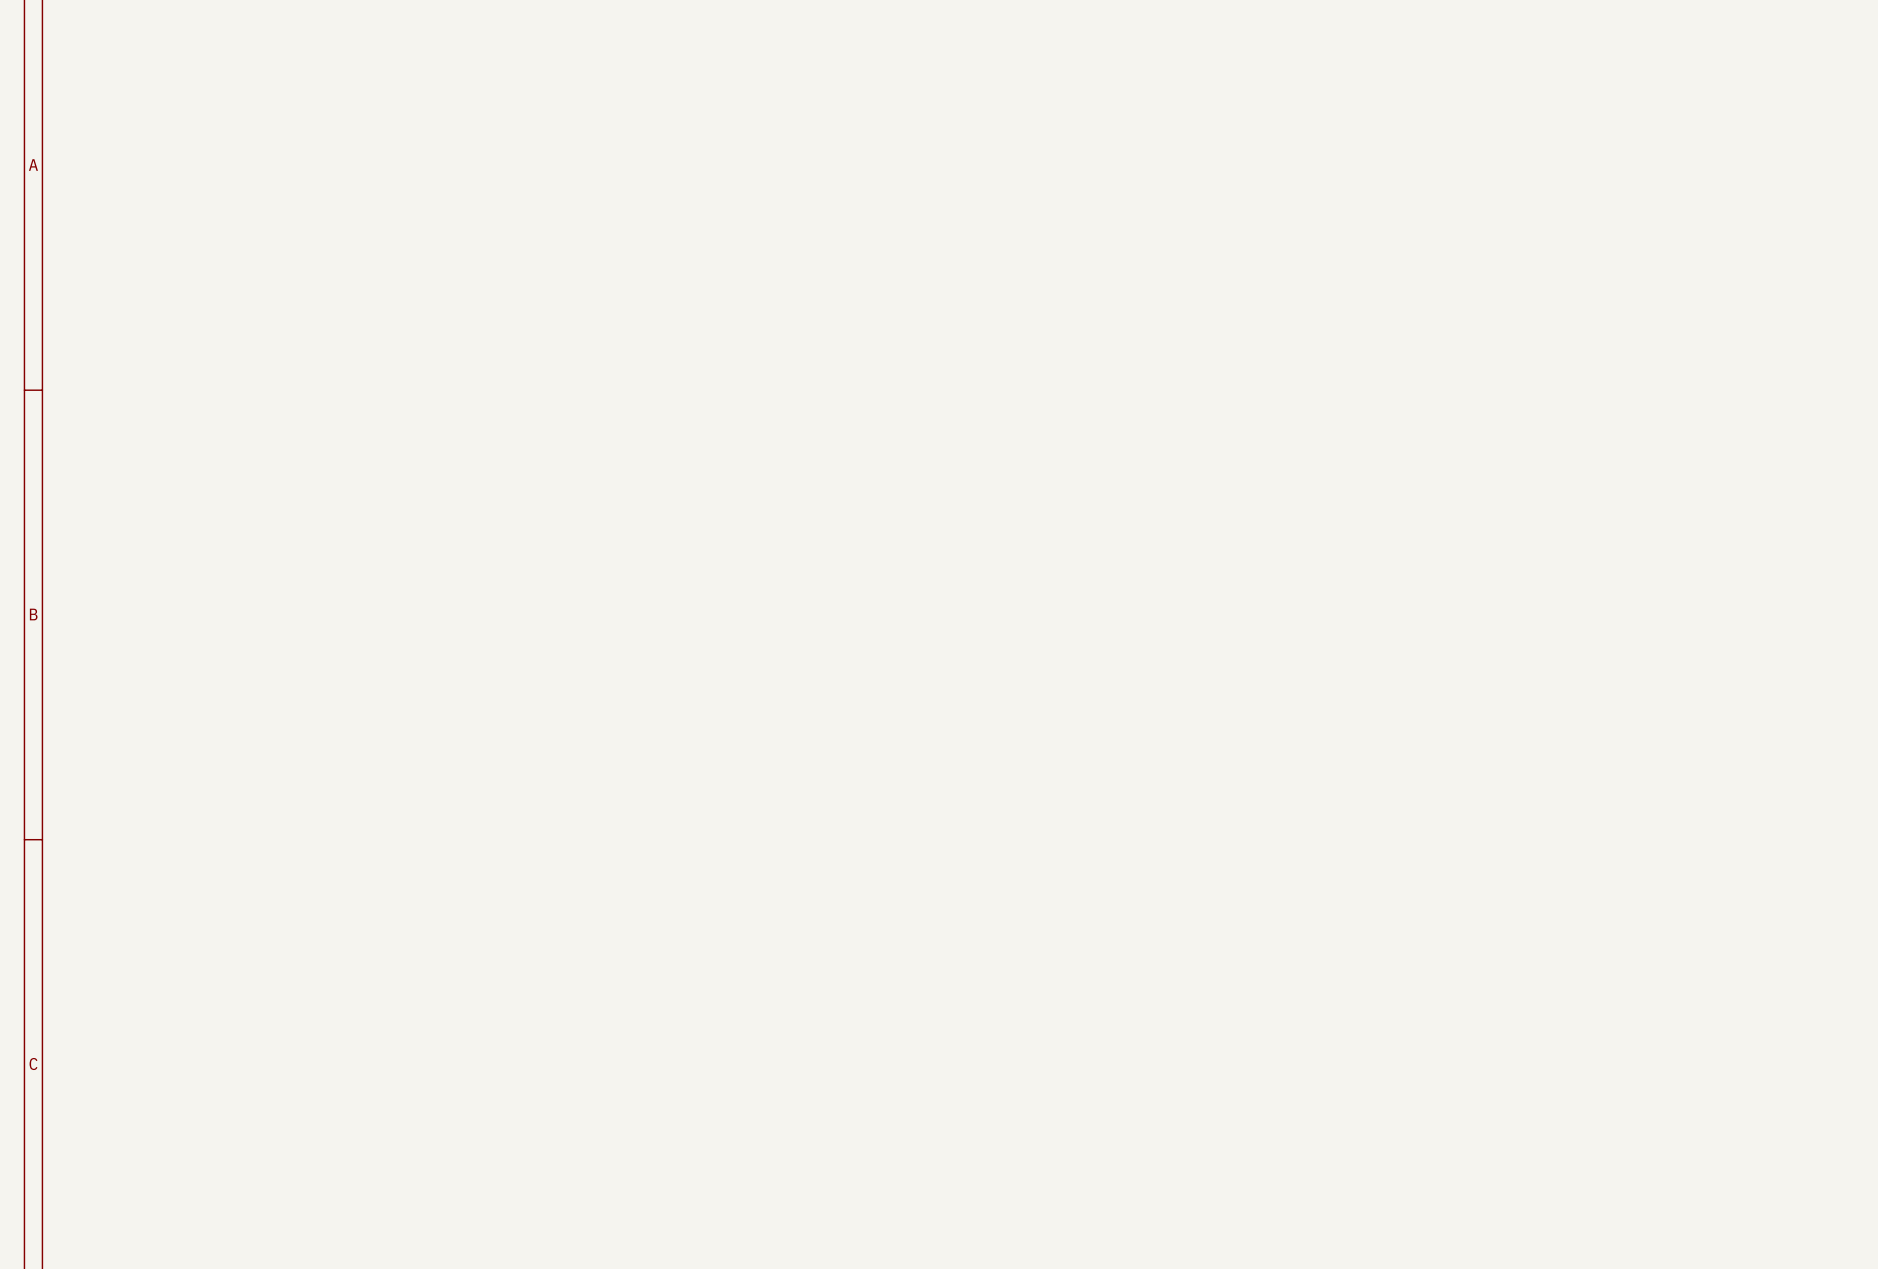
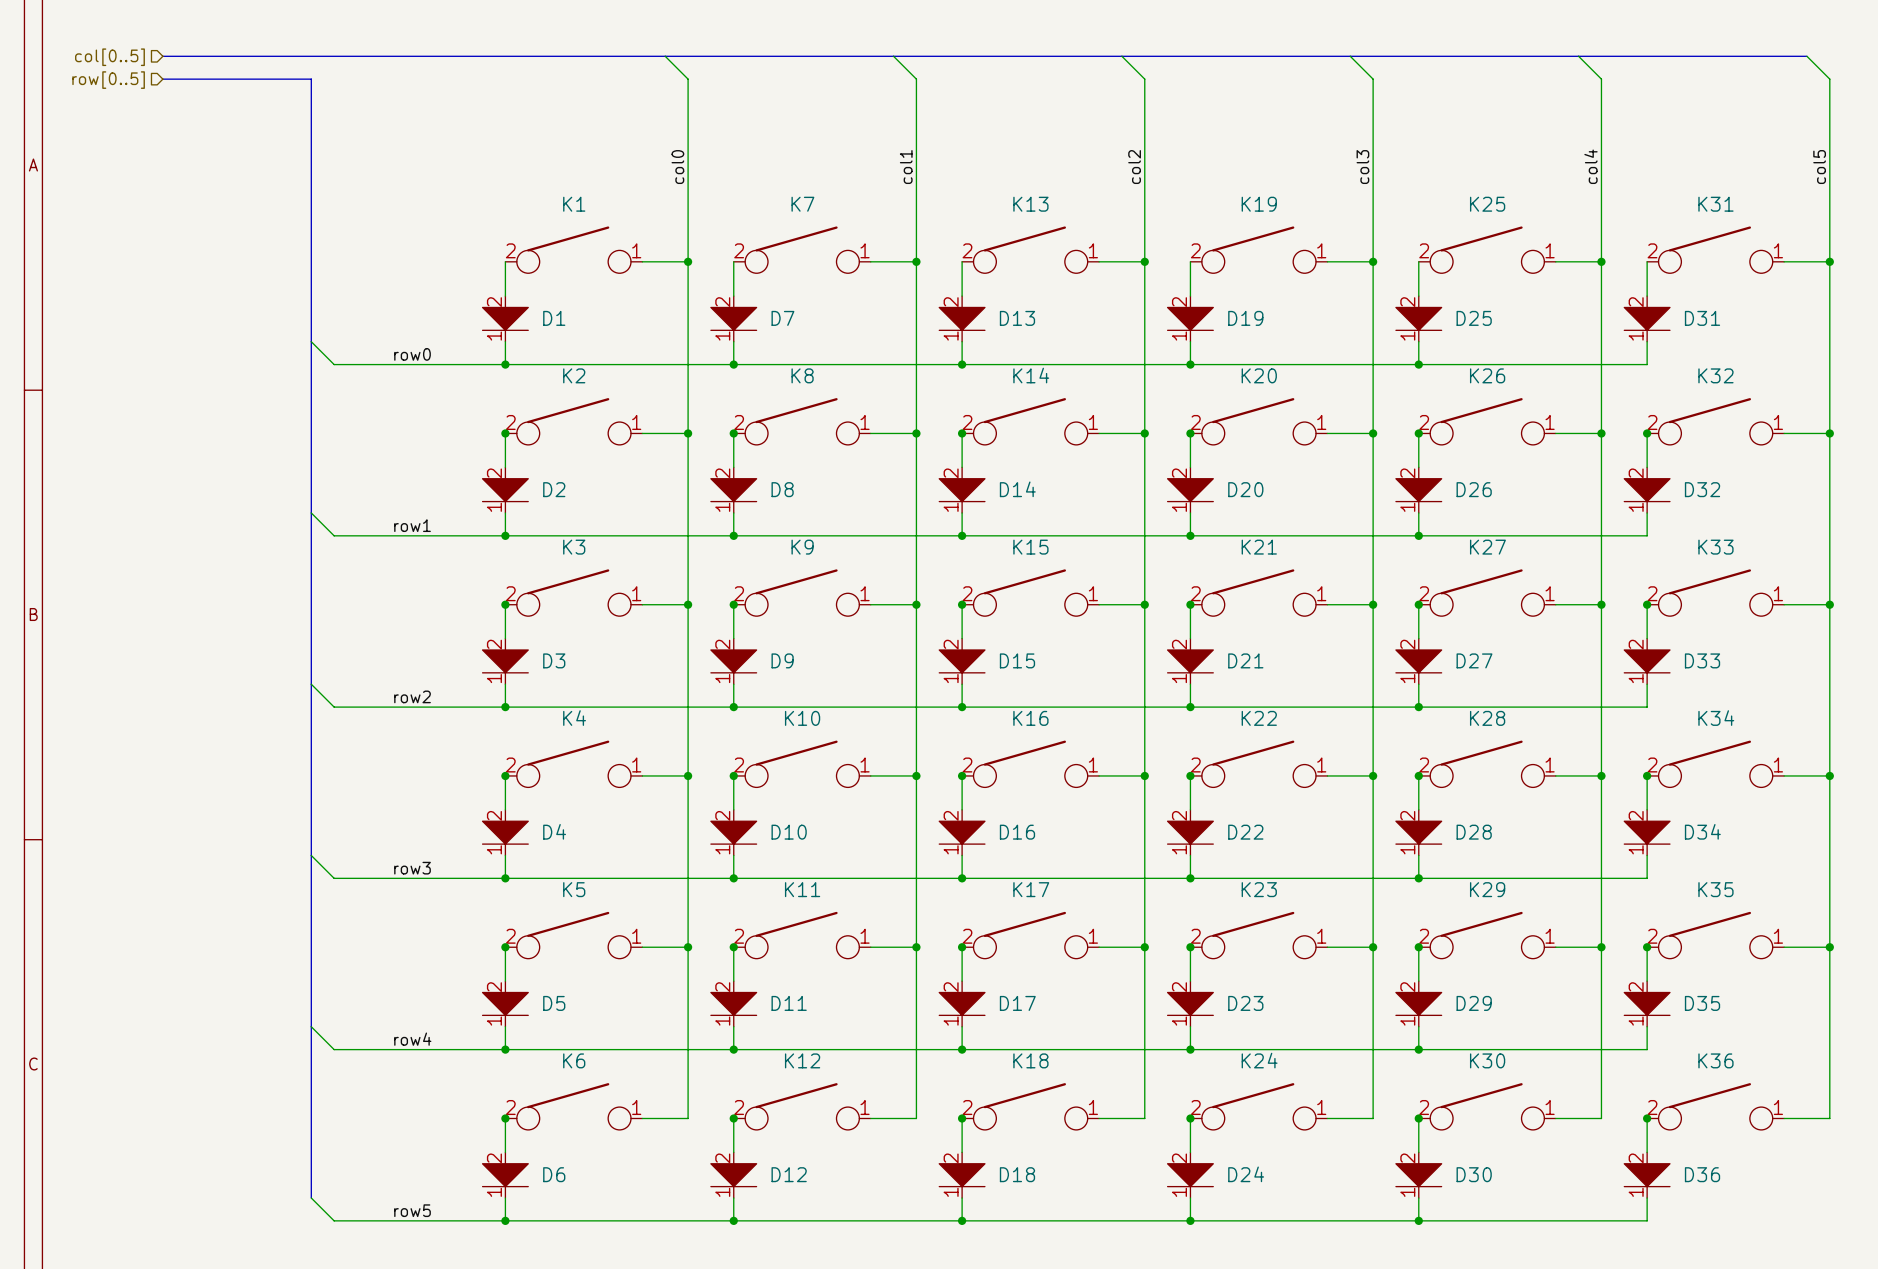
hierarchical label: none -> col[0..5] (109, 57)
bus: none -> (162, 56) (1806, 56)
wire: none -> (665, 56) (688, 79) (688, 1118) (642, 1118)
wire: none -> (893, 56) (916, 79) (916, 1118) (870, 1118)
wire: none -> (1121, 56) (1144, 79) (1144, 1118) (1099, 1118)
wire: none -> (1350, 56) (1373, 79) (1373, 1118) (1327, 1118)
wire: none -> (1578, 56) (1601, 79) (1601, 1118) (1555, 1118)
wire: none -> (1806, 56) (1829, 79) (1829, 1118) (1784, 1118)
hierarchical label: none -> row[0..5] (108, 80)
bus: none -> (162, 79) (311, 79) (311, 1198)
label: none -> col1 (906, 167)
label: none -> col4 (1591, 166)
label: none -> col0 (677, 167)
label: none -> col2 (1134, 167)
label: none -> col3 (1362, 167)
label: none -> col5 (1819, 167)
K1: none -> (573, 249)
K7: none -> (802, 249)
K13: none -> (1030, 249)
K19: none -> (1258, 249)
K25: none -> (1487, 249)
K31: none -> (1715, 249)
wire: none -> (505, 261) (505, 296)
wire: none -> (642, 261) (688, 261)
junction: none -> (688, 261)
wire: none -> (733, 261) (733, 296)
wire: none -> (870, 261) (916, 261)
junction: none -> (916, 261)
wire: none -> (962, 261) (962, 296)
wire: none -> (1099, 261) (1144, 261)
junction: none -> (1144, 261)
wire: none -> (1190, 261) (1190, 296)
wire: none -> (1327, 261) (1373, 261)
junction: none -> (1373, 261)
wire: none -> (1418, 261) (1418, 296)
wire: none -> (1555, 261) (1601, 261)
junction: none -> (1601, 261)
wire: none -> (1647, 261) (1647, 296)
wire: none -> (1784, 261) (1829, 261)
junction: none -> (1829, 261)
D1: none -> (505, 318)
D7: none -> (733, 318)
D13: none -> (962, 318)
D19: none -> (1190, 318)
D25: none -> (1418, 318)
D31: none -> (1647, 318)
wire: none -> (311, 341) (334, 364) (1647, 364) (1647, 341)
wire: none -> (505, 341) (505, 364)
wire: none -> (733, 341) (733, 364)
wire: none -> (962, 341) (962, 364)
wire: none -> (1190, 341) (1190, 364)
wire: none -> (1418, 341) (1418, 364)
label: none -> row0 (412, 354)
junction: none -> (505, 364)
junction: none -> (733, 364)
junction: none -> (962, 364)
junction: none -> (1190, 364)
junction: none -> (1418, 364)
K2: none -> (573, 421)
K8: none -> (802, 421)
K14: none -> (1030, 421)
K20: none -> (1258, 421)
K26: none -> (1487, 421)
K32: none -> (1715, 421)
wire: none -> (505, 433) (505, 467)
junction: none -> (505, 433)
wire: none -> (642, 433) (688, 433)
junction: none -> (688, 433)
wire: none -> (733, 433) (733, 467)
junction: none -> (733, 433)
wire: none -> (870, 433) (916, 433)
junction: none -> (916, 433)
wire: none -> (962, 433) (962, 467)
junction: none -> (962, 433)
wire: none -> (1099, 433) (1144, 433)
junction: none -> (1144, 433)
wire: none -> (1190, 433) (1190, 467)
junction: none -> (1190, 433)
wire: none -> (1327, 433) (1373, 433)
junction: none -> (1373, 433)
wire: none -> (1418, 433) (1418, 467)
junction: none -> (1418, 433)
wire: none -> (1555, 433) (1601, 433)
junction: none -> (1601, 433)
wire: none -> (1647, 433) (1647, 467)
junction: none -> (1647, 433)
wire: none -> (1784, 433) (1829, 433)
junction: none -> (1829, 433)
D2: none -> (505, 490)
D8: none -> (733, 490)
D14: none -> (962, 490)
D20: none -> (1190, 490)
D26: none -> (1418, 490)
D32: none -> (1647, 490)
wire: none -> (311, 513) (334, 535) (1647, 535) (1647, 513)
wire: none -> (505, 513) (505, 535)
wire: none -> (733, 513) (733, 535)
wire: none -> (962, 513) (962, 535)
wire: none -> (1190, 513) (1190, 535)
wire: none -> (1418, 513) (1418, 535)
label: none -> row1 (412, 525)
junction: none -> (505, 535)
junction: none -> (733, 535)
junction: none -> (962, 535)
junction: none -> (1190, 535)
junction: none -> (1418, 535)
K3: none -> (573, 592)
K9: none -> (802, 592)
K15: none -> (1030, 592)
K21: none -> (1258, 592)
K27: none -> (1487, 592)
K33: none -> (1715, 592)
wire: none -> (505, 604) (505, 638)
junction: none -> (505, 604)
wire: none -> (642, 604) (688, 604)
junction: none -> (688, 604)
wire: none -> (733, 604) (733, 638)
junction: none -> (733, 604)
wire: none -> (870, 604) (916, 604)
junction: none -> (916, 604)
wire: none -> (962, 604) (962, 638)
junction: none -> (962, 604)
wire: none -> (1099, 604) (1144, 604)
junction: none -> (1144, 604)
wire: none -> (1190, 604) (1190, 638)
junction: none -> (1190, 604)
wire: none -> (1327, 604) (1373, 604)
junction: none -> (1373, 604)
wire: none -> (1418, 604) (1418, 638)
junction: none -> (1418, 604)
wire: none -> (1555, 604) (1601, 604)
junction: none -> (1601, 604)
wire: none -> (1647, 604) (1647, 638)
junction: none -> (1647, 604)
wire: none -> (1784, 604) (1829, 604)
junction: none -> (1829, 604)
D3: none -> (505, 661)
D9: none -> (733, 661)
D15: none -> (962, 661)
D21: none -> (1190, 661)
D27: none -> (1418, 661)
D33: none -> (1647, 661)
wire: none -> (311, 684) (334, 707) (1647, 707) (1647, 684)
wire: none -> (505, 684) (505, 707)
wire: none -> (733, 684) (733, 707)
wire: none -> (962, 684) (962, 707)
wire: none -> (1190, 684) (1190, 707)
wire: none -> (1418, 684) (1418, 707)
label: none -> row2 (412, 696)
junction: none -> (505, 707)
junction: none -> (733, 707)
junction: none -> (962, 707)
junction: none -> (1190, 707)
junction: none -> (1418, 707)
K4: none -> (573, 763)
K10: none -> (802, 763)
K16: none -> (1030, 763)
K22: none -> (1258, 763)
K28: none -> (1487, 763)
K34: none -> (1715, 763)
wire: none -> (505, 775) (505, 809)
junction: none -> (505, 775)
wire: none -> (642, 775) (688, 775)
junction: none -> (688, 775)
wire: none -> (733, 775) (733, 809)
junction: none -> (733, 775)
wire: none -> (870, 775) (916, 775)
junction: none -> (916, 775)
wire: none -> (962, 775) (962, 809)
junction: none -> (962, 775)
wire: none -> (1099, 775) (1144, 775)
junction: none -> (1144, 775)
wire: none -> (1190, 775) (1190, 809)
junction: none -> (1190, 775)
wire: none -> (1327, 775) (1373, 775)
junction: none -> (1373, 775)
wire: none -> (1418, 775) (1418, 809)
junction: none -> (1418, 775)
wire: none -> (1555, 775) (1601, 775)
junction: none -> (1601, 775)
wire: none -> (1647, 775) (1647, 809)
junction: none -> (1647, 775)
wire: none -> (1784, 775) (1829, 775)
junction: none -> (1829, 775)
D4: none -> (505, 832)
D10: none -> (733, 832)
D16: none -> (962, 832)
D22: none -> (1190, 832)
D28: none -> (1418, 832)
D34: none -> (1647, 832)
wire: none -> (311, 855) (334, 878) (1647, 878) (1647, 855)
wire: none -> (505, 855) (505, 878)
wire: none -> (733, 855) (733, 878)
wire: none -> (962, 855) (962, 878)
wire: none -> (1190, 855) (1190, 878)
wire: none -> (1418, 855) (1418, 878)
label: none -> row3 (412, 868)
junction: none -> (505, 878)
junction: none -> (733, 878)
junction: none -> (962, 878)
junction: none -> (1190, 878)
junction: none -> (1418, 878)
K5: none -> (573, 935)
K11: none -> (802, 935)
K17: none -> (1030, 935)
K23: none -> (1258, 935)
K29: none -> (1487, 935)
K35: none -> (1715, 935)
wire: none -> (505, 946) (505, 981)
wire: none -> (733, 946) (733, 981)
wire: none -> (962, 946) (962, 981)
wire: none -> (1190, 946) (1190, 981)
wire: none -> (1418, 946) (1418, 981)
wire: none -> (1647, 946) (1647, 981)
junction: none -> (505, 947)
wire: none -> (642, 947) (688, 947)
junction: none -> (688, 947)
junction: none -> (733, 947)
wire: none -> (870, 947) (916, 947)
junction: none -> (916, 947)
junction: none -> (962, 947)
wire: none -> (1099, 947) (1144, 947)
junction: none -> (1144, 947)
junction: none -> (1190, 947)
wire: none -> (1327, 947) (1373, 947)
junction: none -> (1373, 947)
junction: none -> (1418, 947)
wire: none -> (1555, 947) (1601, 947)
junction: none -> (1601, 947)
junction: none -> (1647, 947)
wire: none -> (1784, 947) (1829, 947)
junction: none -> (1829, 947)
D5: none -> (505, 1003)
D11: none -> (733, 1003)
D17: none -> (962, 1003)
D23: none -> (1190, 1003)
D29: none -> (1418, 1003)
D35: none -> (1647, 1003)
wire: none -> (311, 1026) (334, 1049) (1647, 1049) (1647, 1026)
wire: none -> (505, 1026) (505, 1049)
wire: none -> (733, 1026) (733, 1049)
wire: none -> (962, 1026) (962, 1049)
wire: none -> (1190, 1026) (1190, 1049)
wire: none -> (1418, 1026) (1418, 1049)
label: none -> row4 (412, 1039)
junction: none -> (505, 1049)
junction: none -> (733, 1049)
junction: none -> (962, 1049)
junction: none -> (1190, 1049)
junction: none -> (1418, 1049)
K6: none -> (573, 1106)
K12: none -> (802, 1106)
K18: none -> (1030, 1106)
K24: none -> (1258, 1106)
K30: none -> (1487, 1106)
K36: none -> (1715, 1106)
wire: none -> (505, 1118) (505, 1152)
junction: none -> (505, 1118)
wire: none -> (733, 1118) (733, 1152)
junction: none -> (733, 1118)
wire: none -> (962, 1118) (962, 1152)
junction: none -> (962, 1118)
wire: none -> (1190, 1118) (1190, 1152)
junction: none -> (1190, 1118)
wire: none -> (1418, 1118) (1418, 1152)
junction: none -> (1418, 1118)
wire: none -> (1647, 1118) (1647, 1152)
junction: none -> (1647, 1118)
D6: none -> (505, 1175)
D12: none -> (733, 1175)
D18: none -> (962, 1175)
D24: none -> (1190, 1175)
D30: none -> (1418, 1175)
D36: none -> (1647, 1175)
wire: none -> (311, 1198) (334, 1220) (1647, 1220) (1647, 1198)
wire: none -> (505, 1198) (505, 1220)
wire: none -> (733, 1198) (733, 1220)
wire: none -> (962, 1198) (962, 1220)
wire: none -> (1190, 1198) (1190, 1220)
wire: none -> (1418, 1198) (1418, 1220)
label: none -> row5 (412, 1210)
junction: none -> (505, 1220)
junction: none -> (733, 1220)
junction: none -> (962, 1220)
junction: none -> (1190, 1220)
junction: none -> (1418, 1220)

